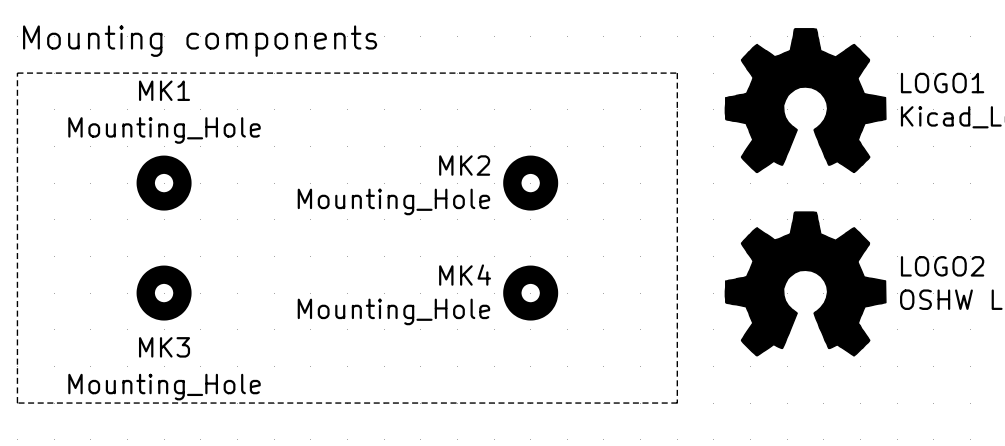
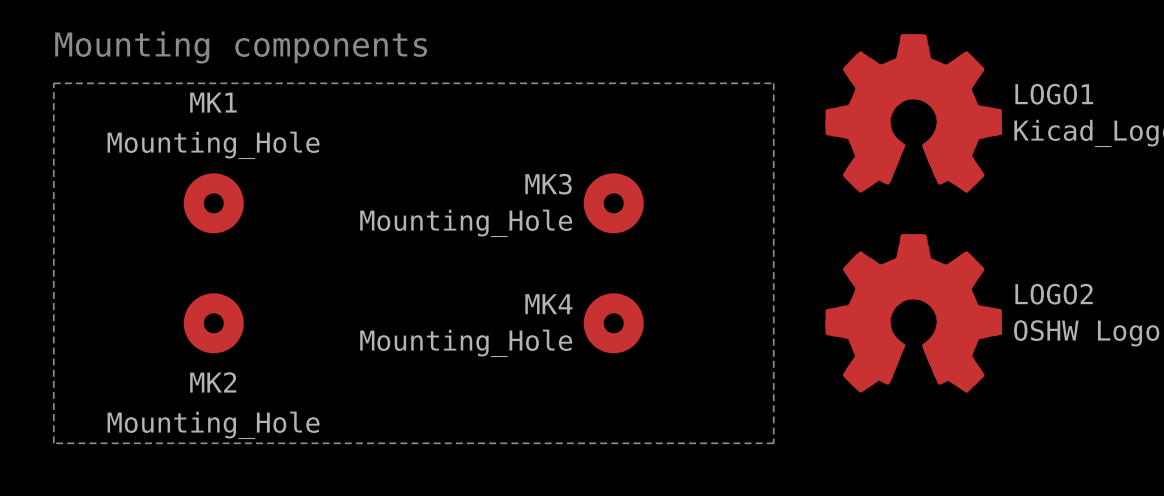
MK2 name: MK2 (464, 165) -> MK3 (548, 184)
MK3 name: MK3 (164, 347) -> MK2 (213, 382)

